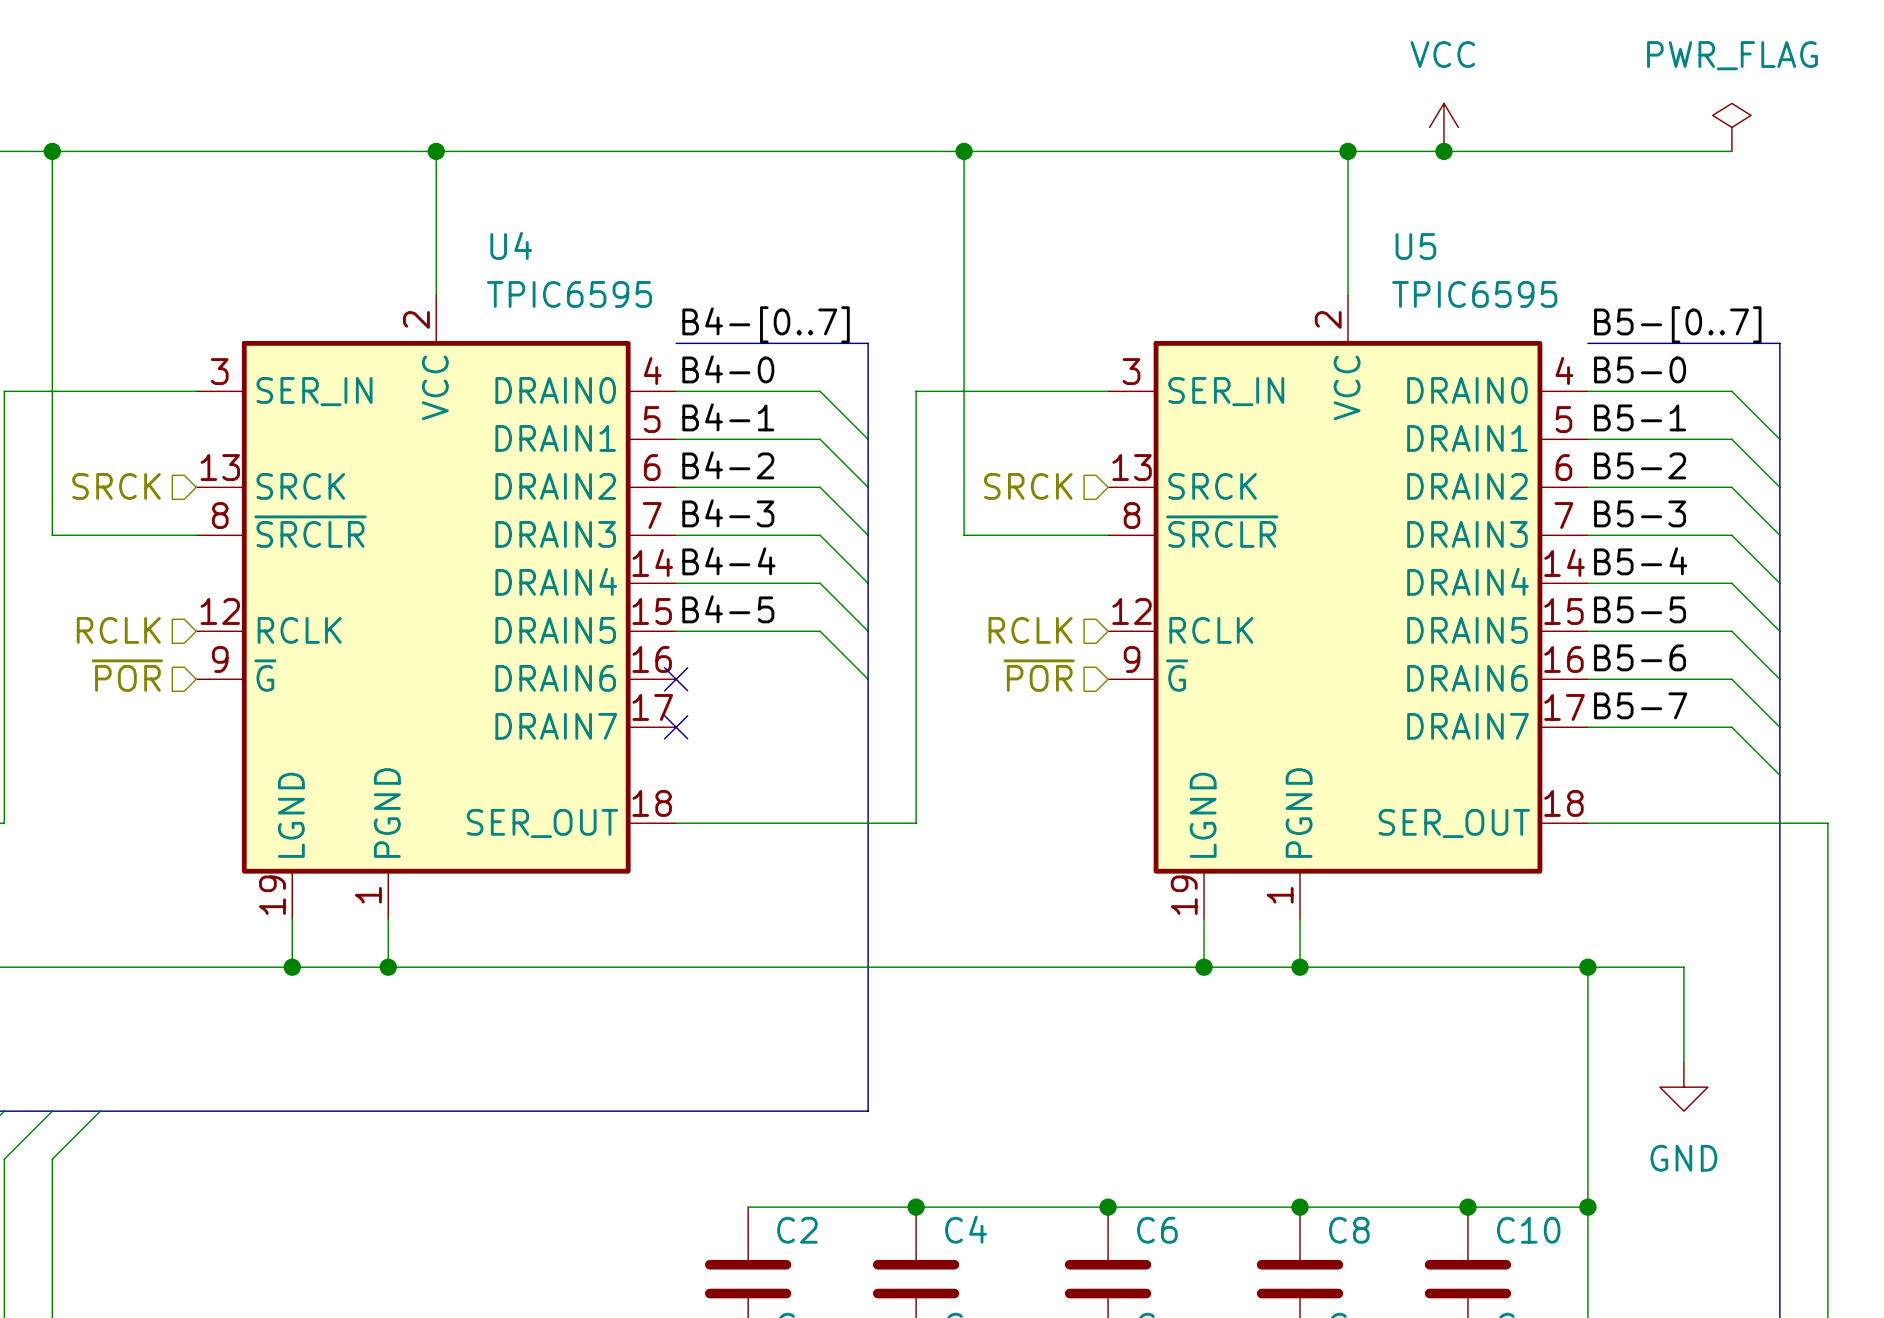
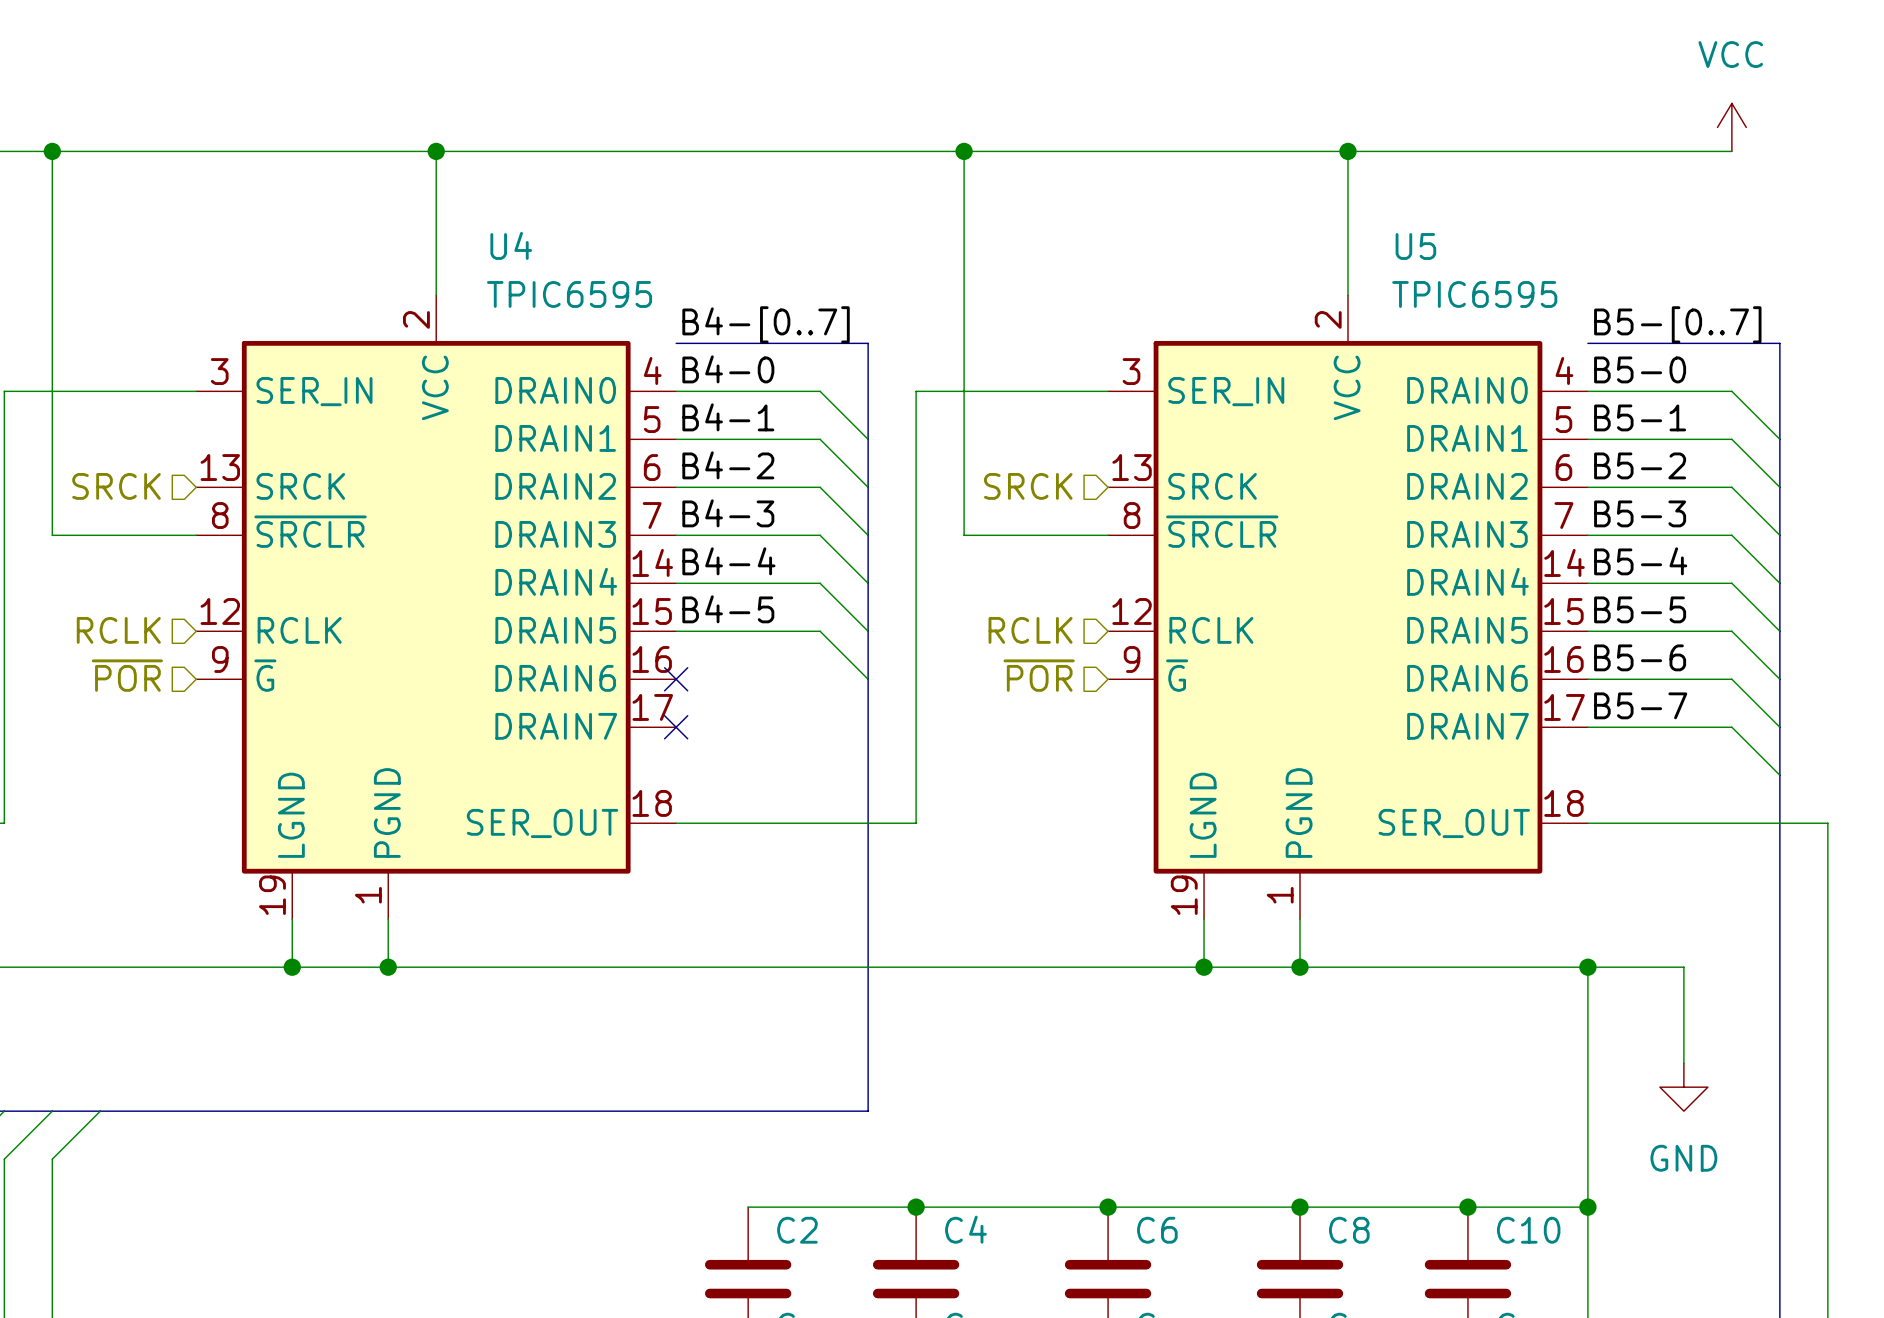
power symbol: VCC (1443, 127) -> none
power symbol: PWR_FLAG (1731, 127) -> VCC (1731, 127)
junction: (1443, 151) -> none

